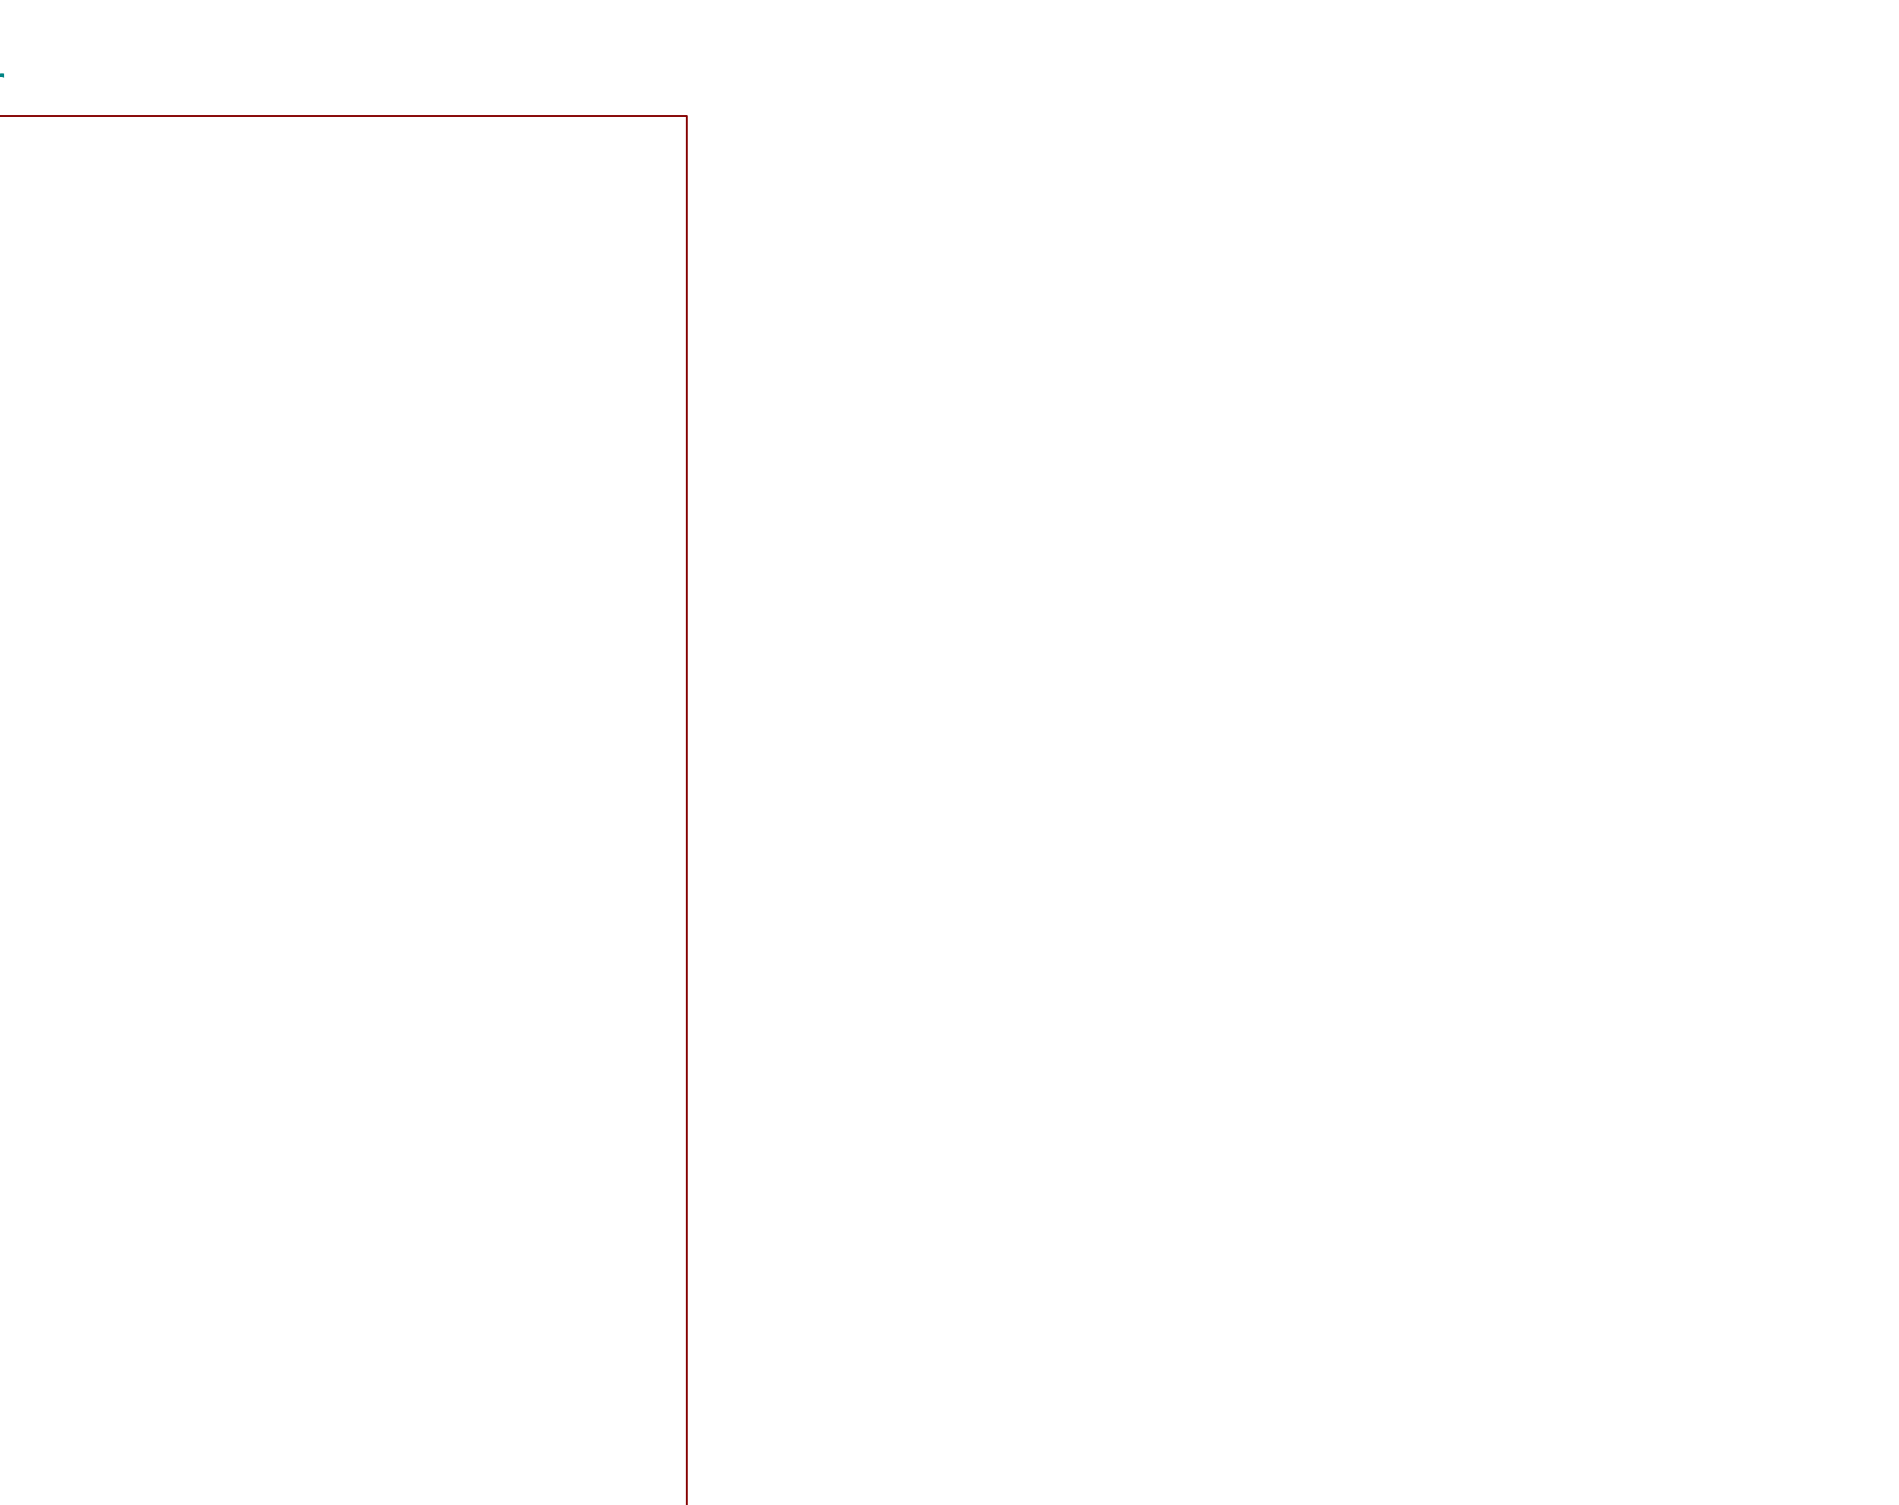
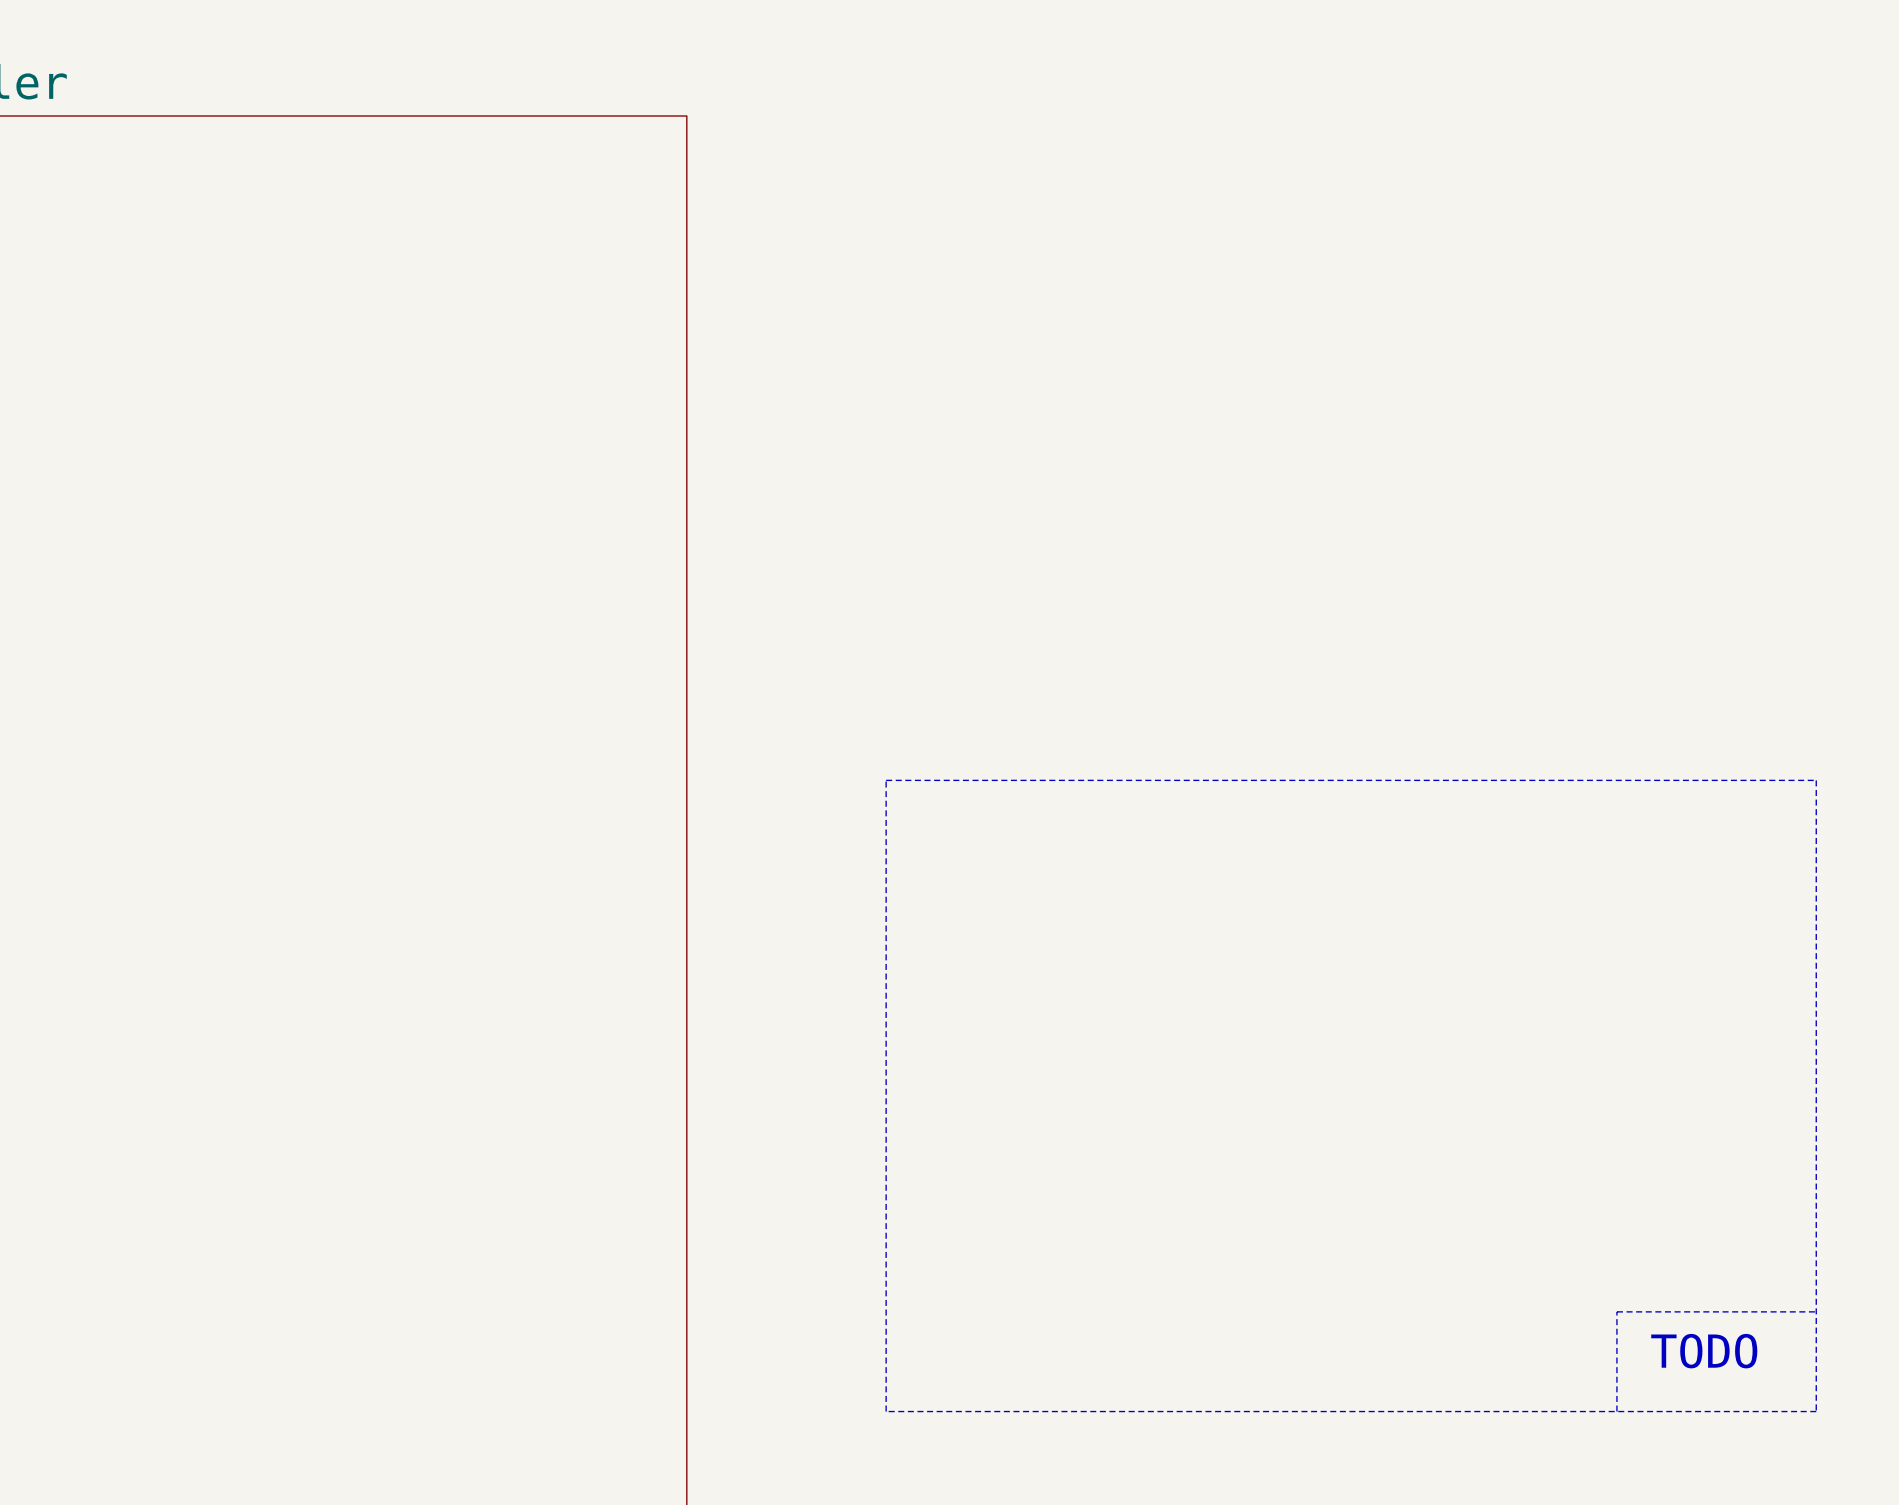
line: none -> (886, 780) (886, 1411) (1816, 1411) (1816, 780) (886, 780)
line: none -> (1816, 1311) (1616, 1311) (1616, 1411)
text: none -> TODO (1704, 1351)

